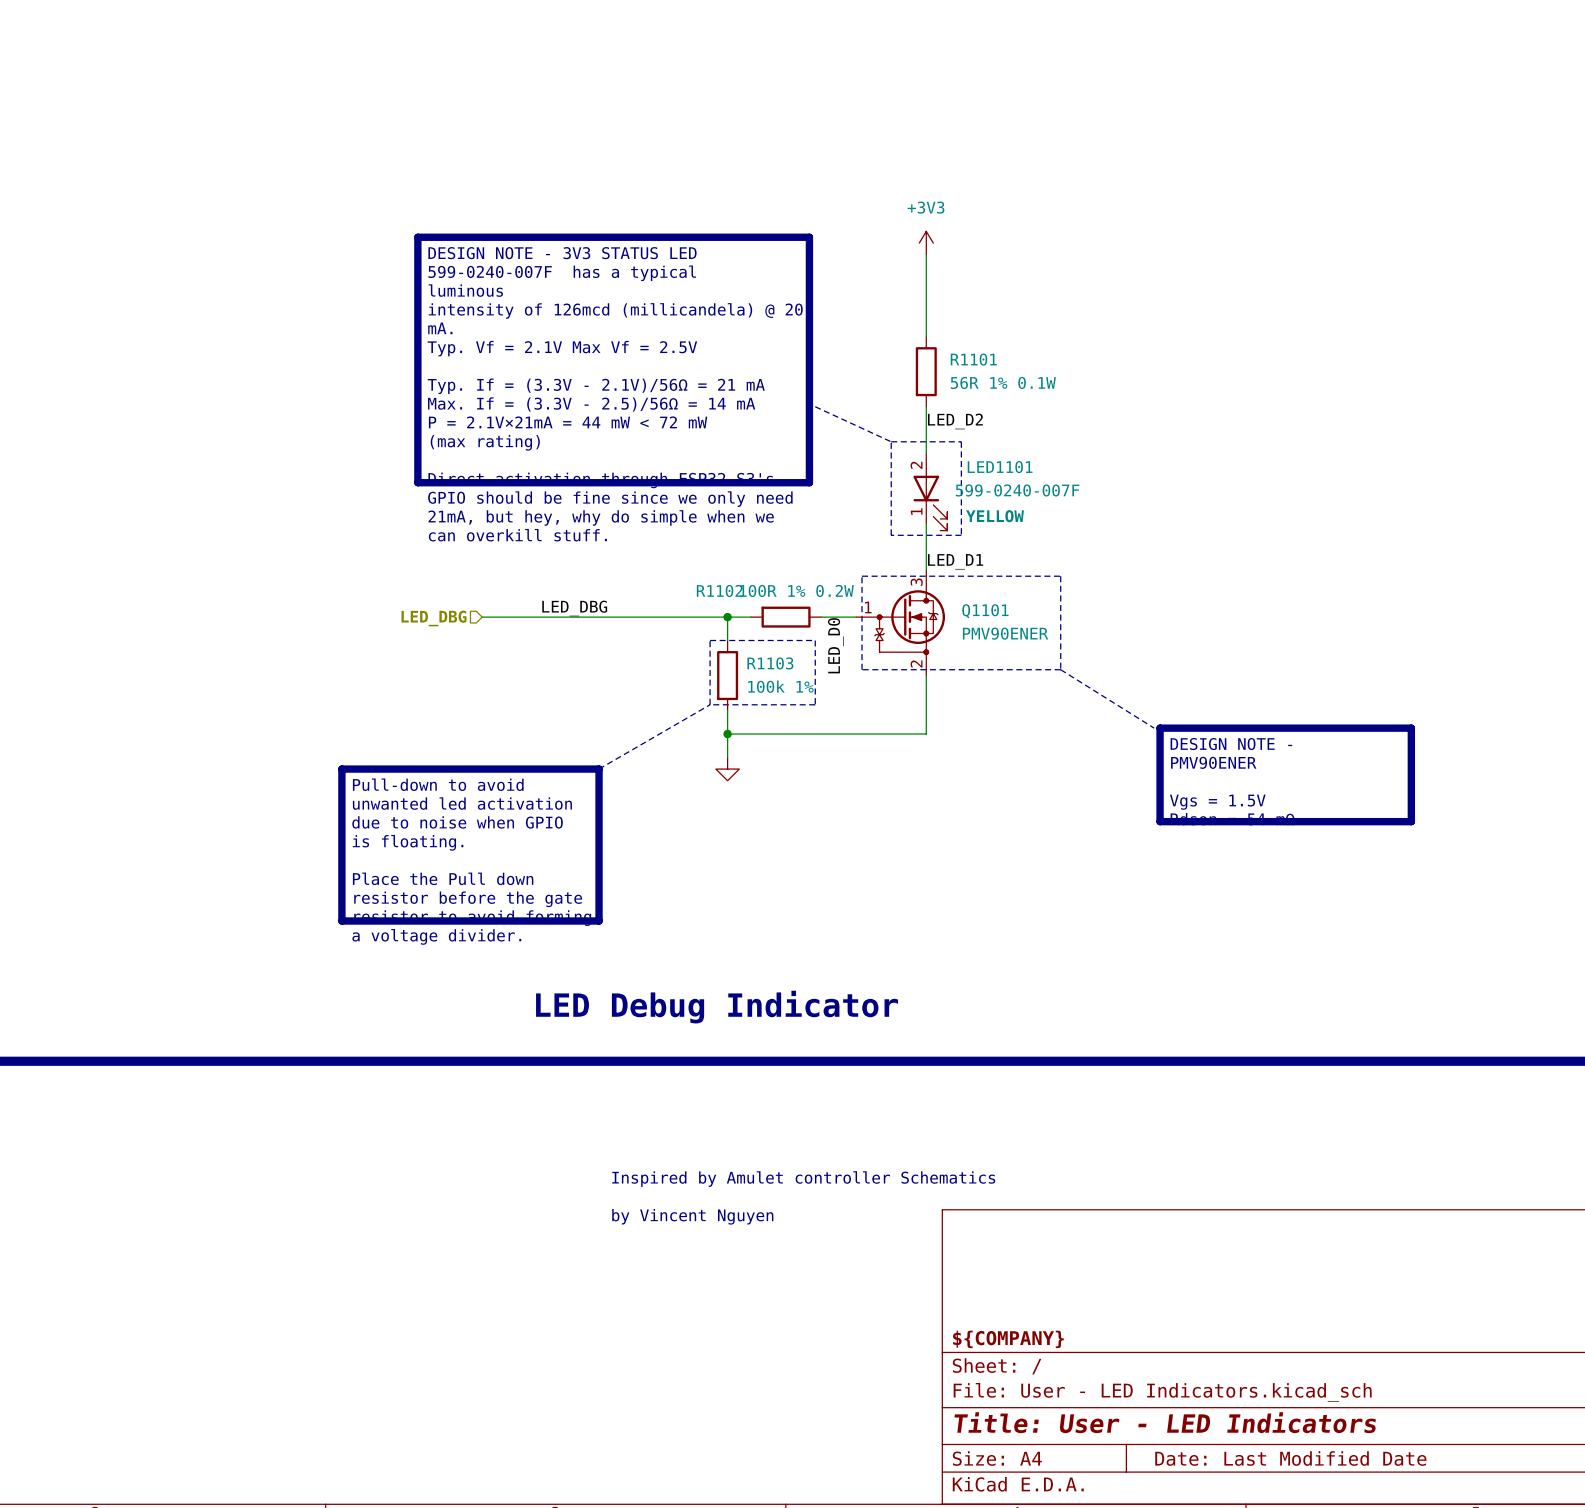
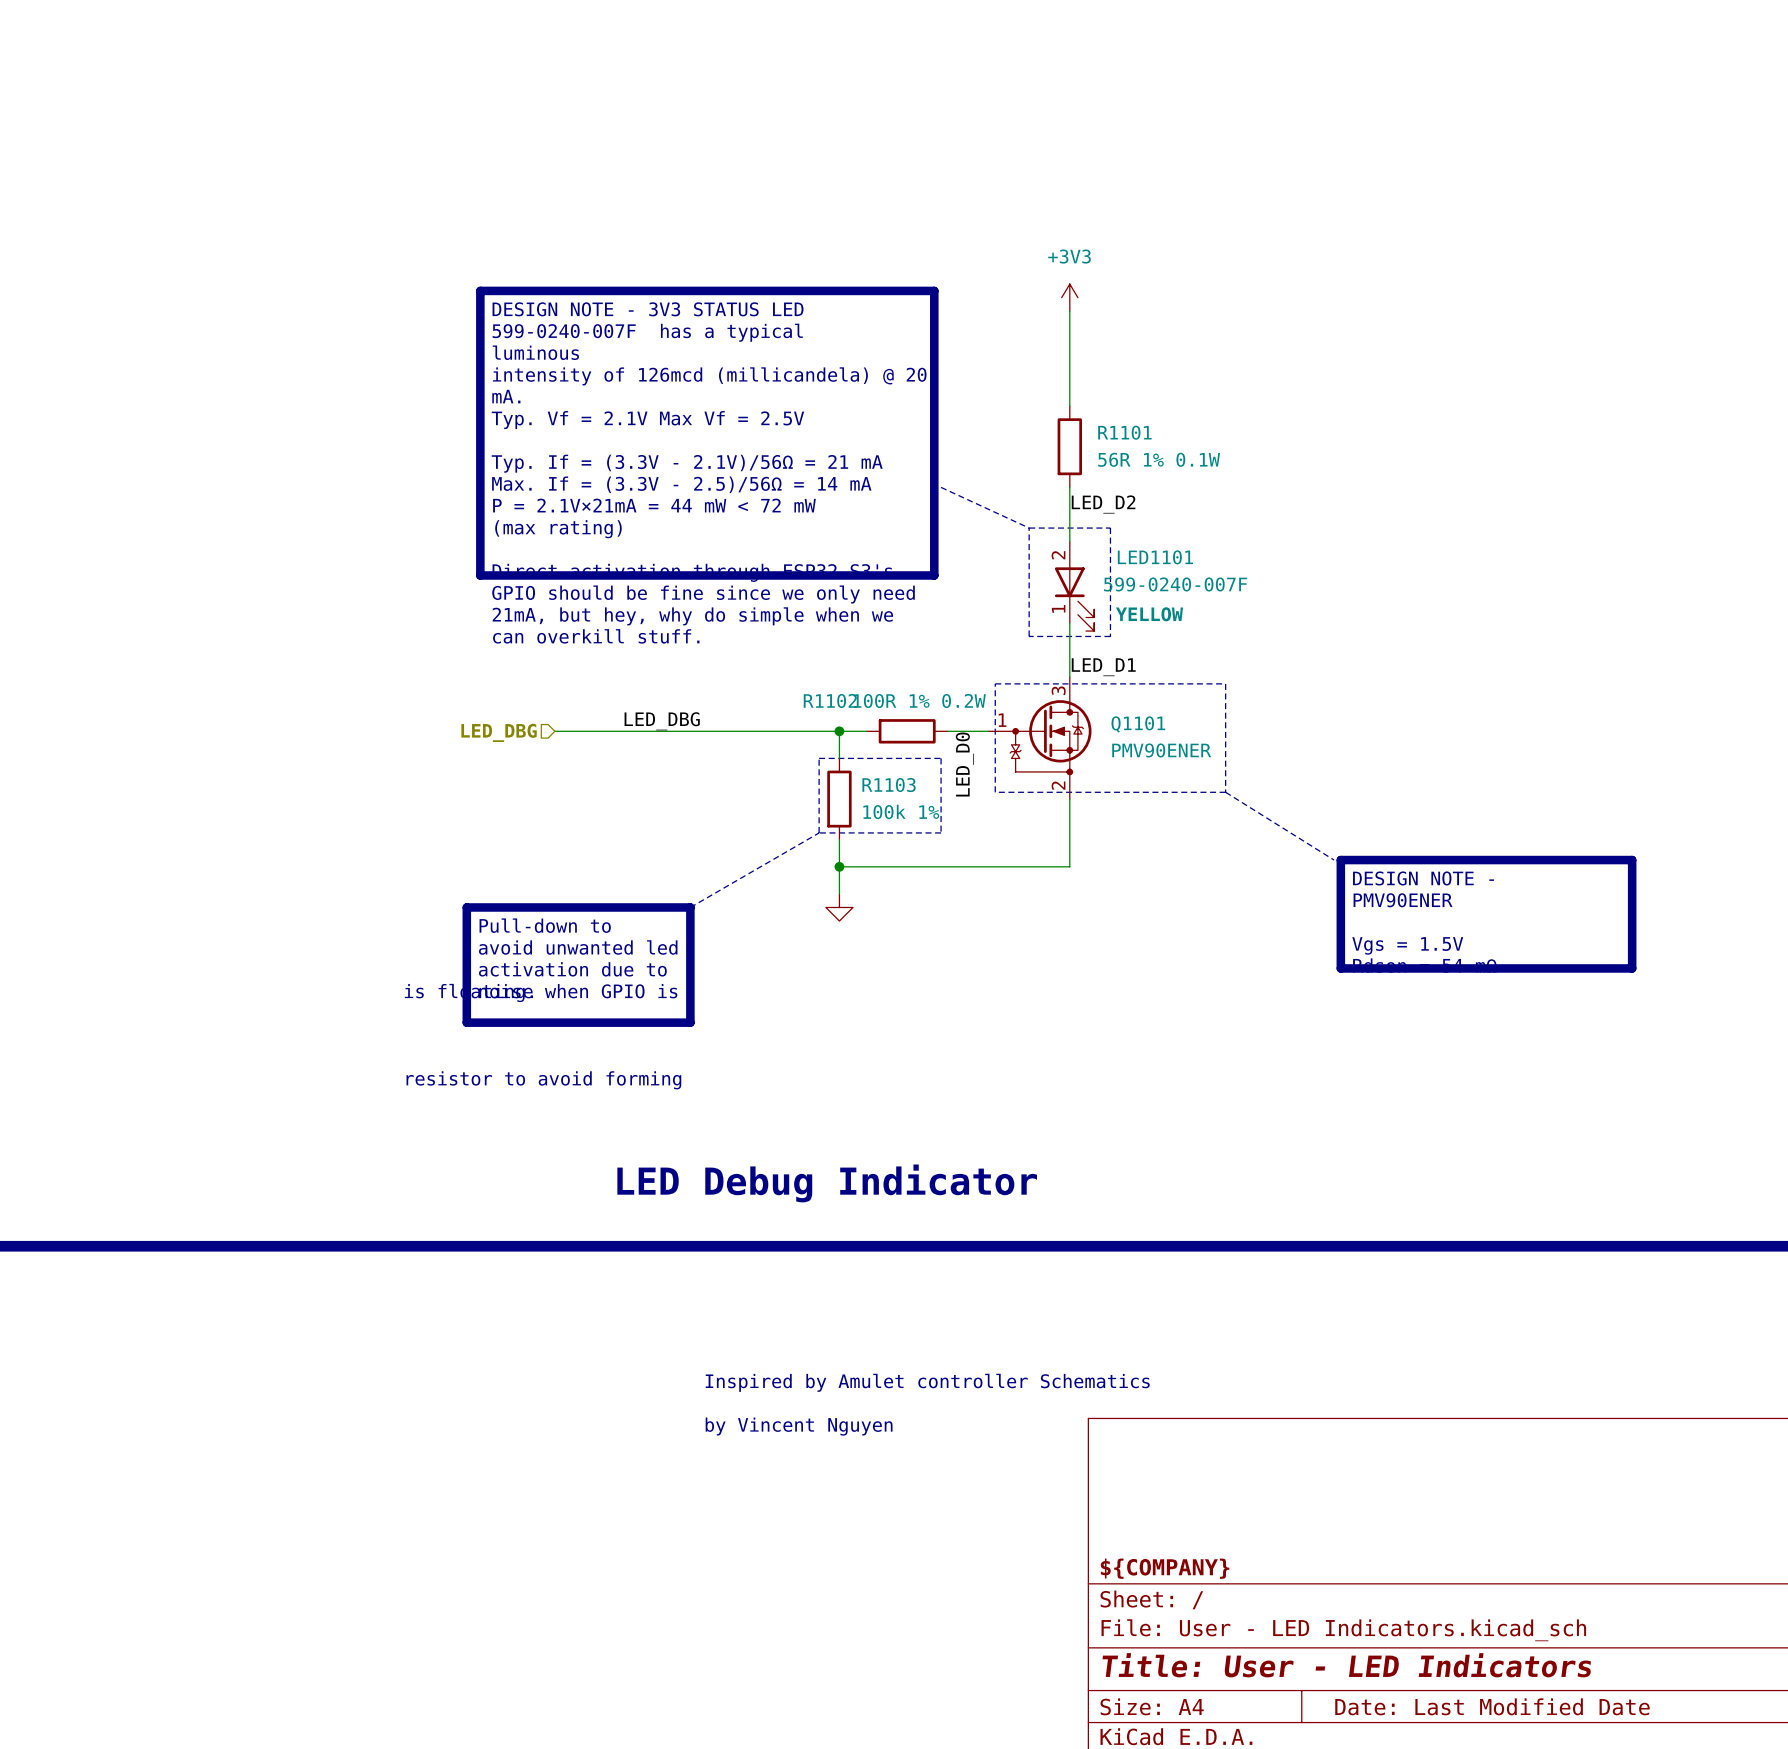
line: (406, 769) (341, 769) (341, 921) (599, 921) (599, 868) -> (466, 907) (466, 1022) (690, 1022)
text: Pull-down to avoid (438, 784) -> Pull-down to (545, 925)
text: unwanted led activation (462, 803) -> none
text: none -> avoid unwanted led (578, 947)
text: due to noise when GPIO (457, 822) -> noise when GPIO is (578, 991)
text: none -> activation due to (572, 969)
text: Place the Pull down (443, 878) -> none
text: resistor before the gate (468, 899) -> none
text: a voltage divider. (436, 936) -> none

